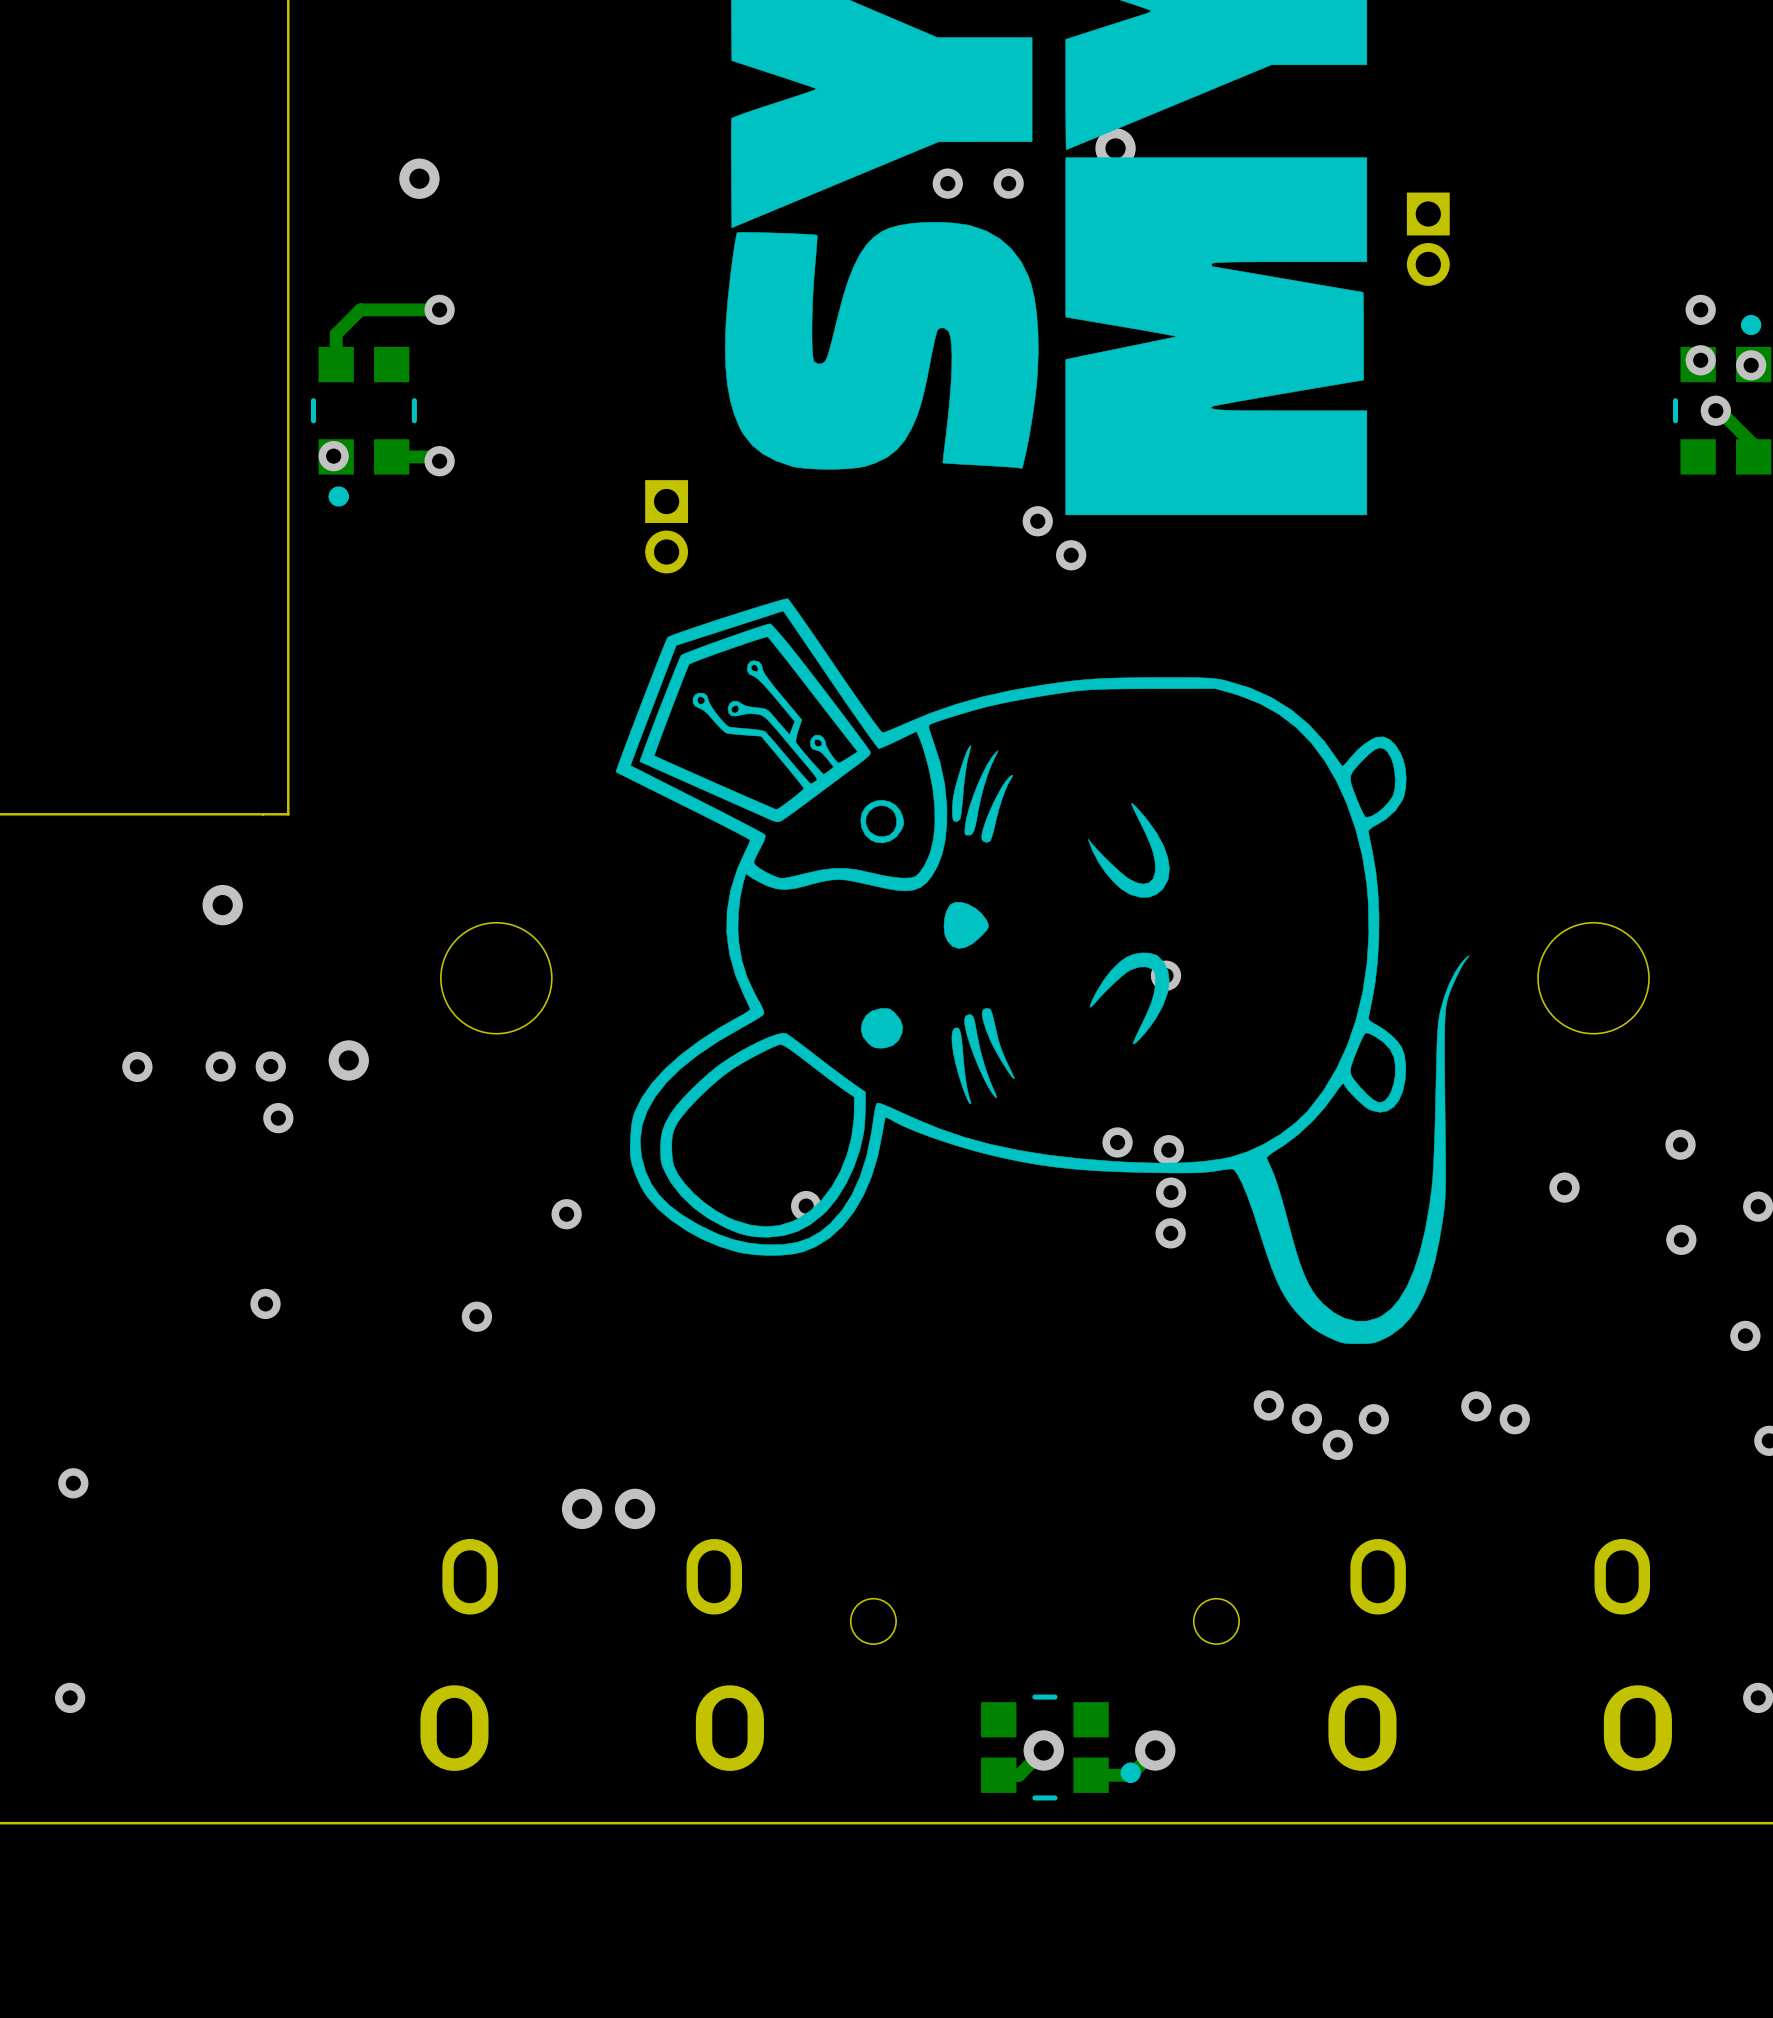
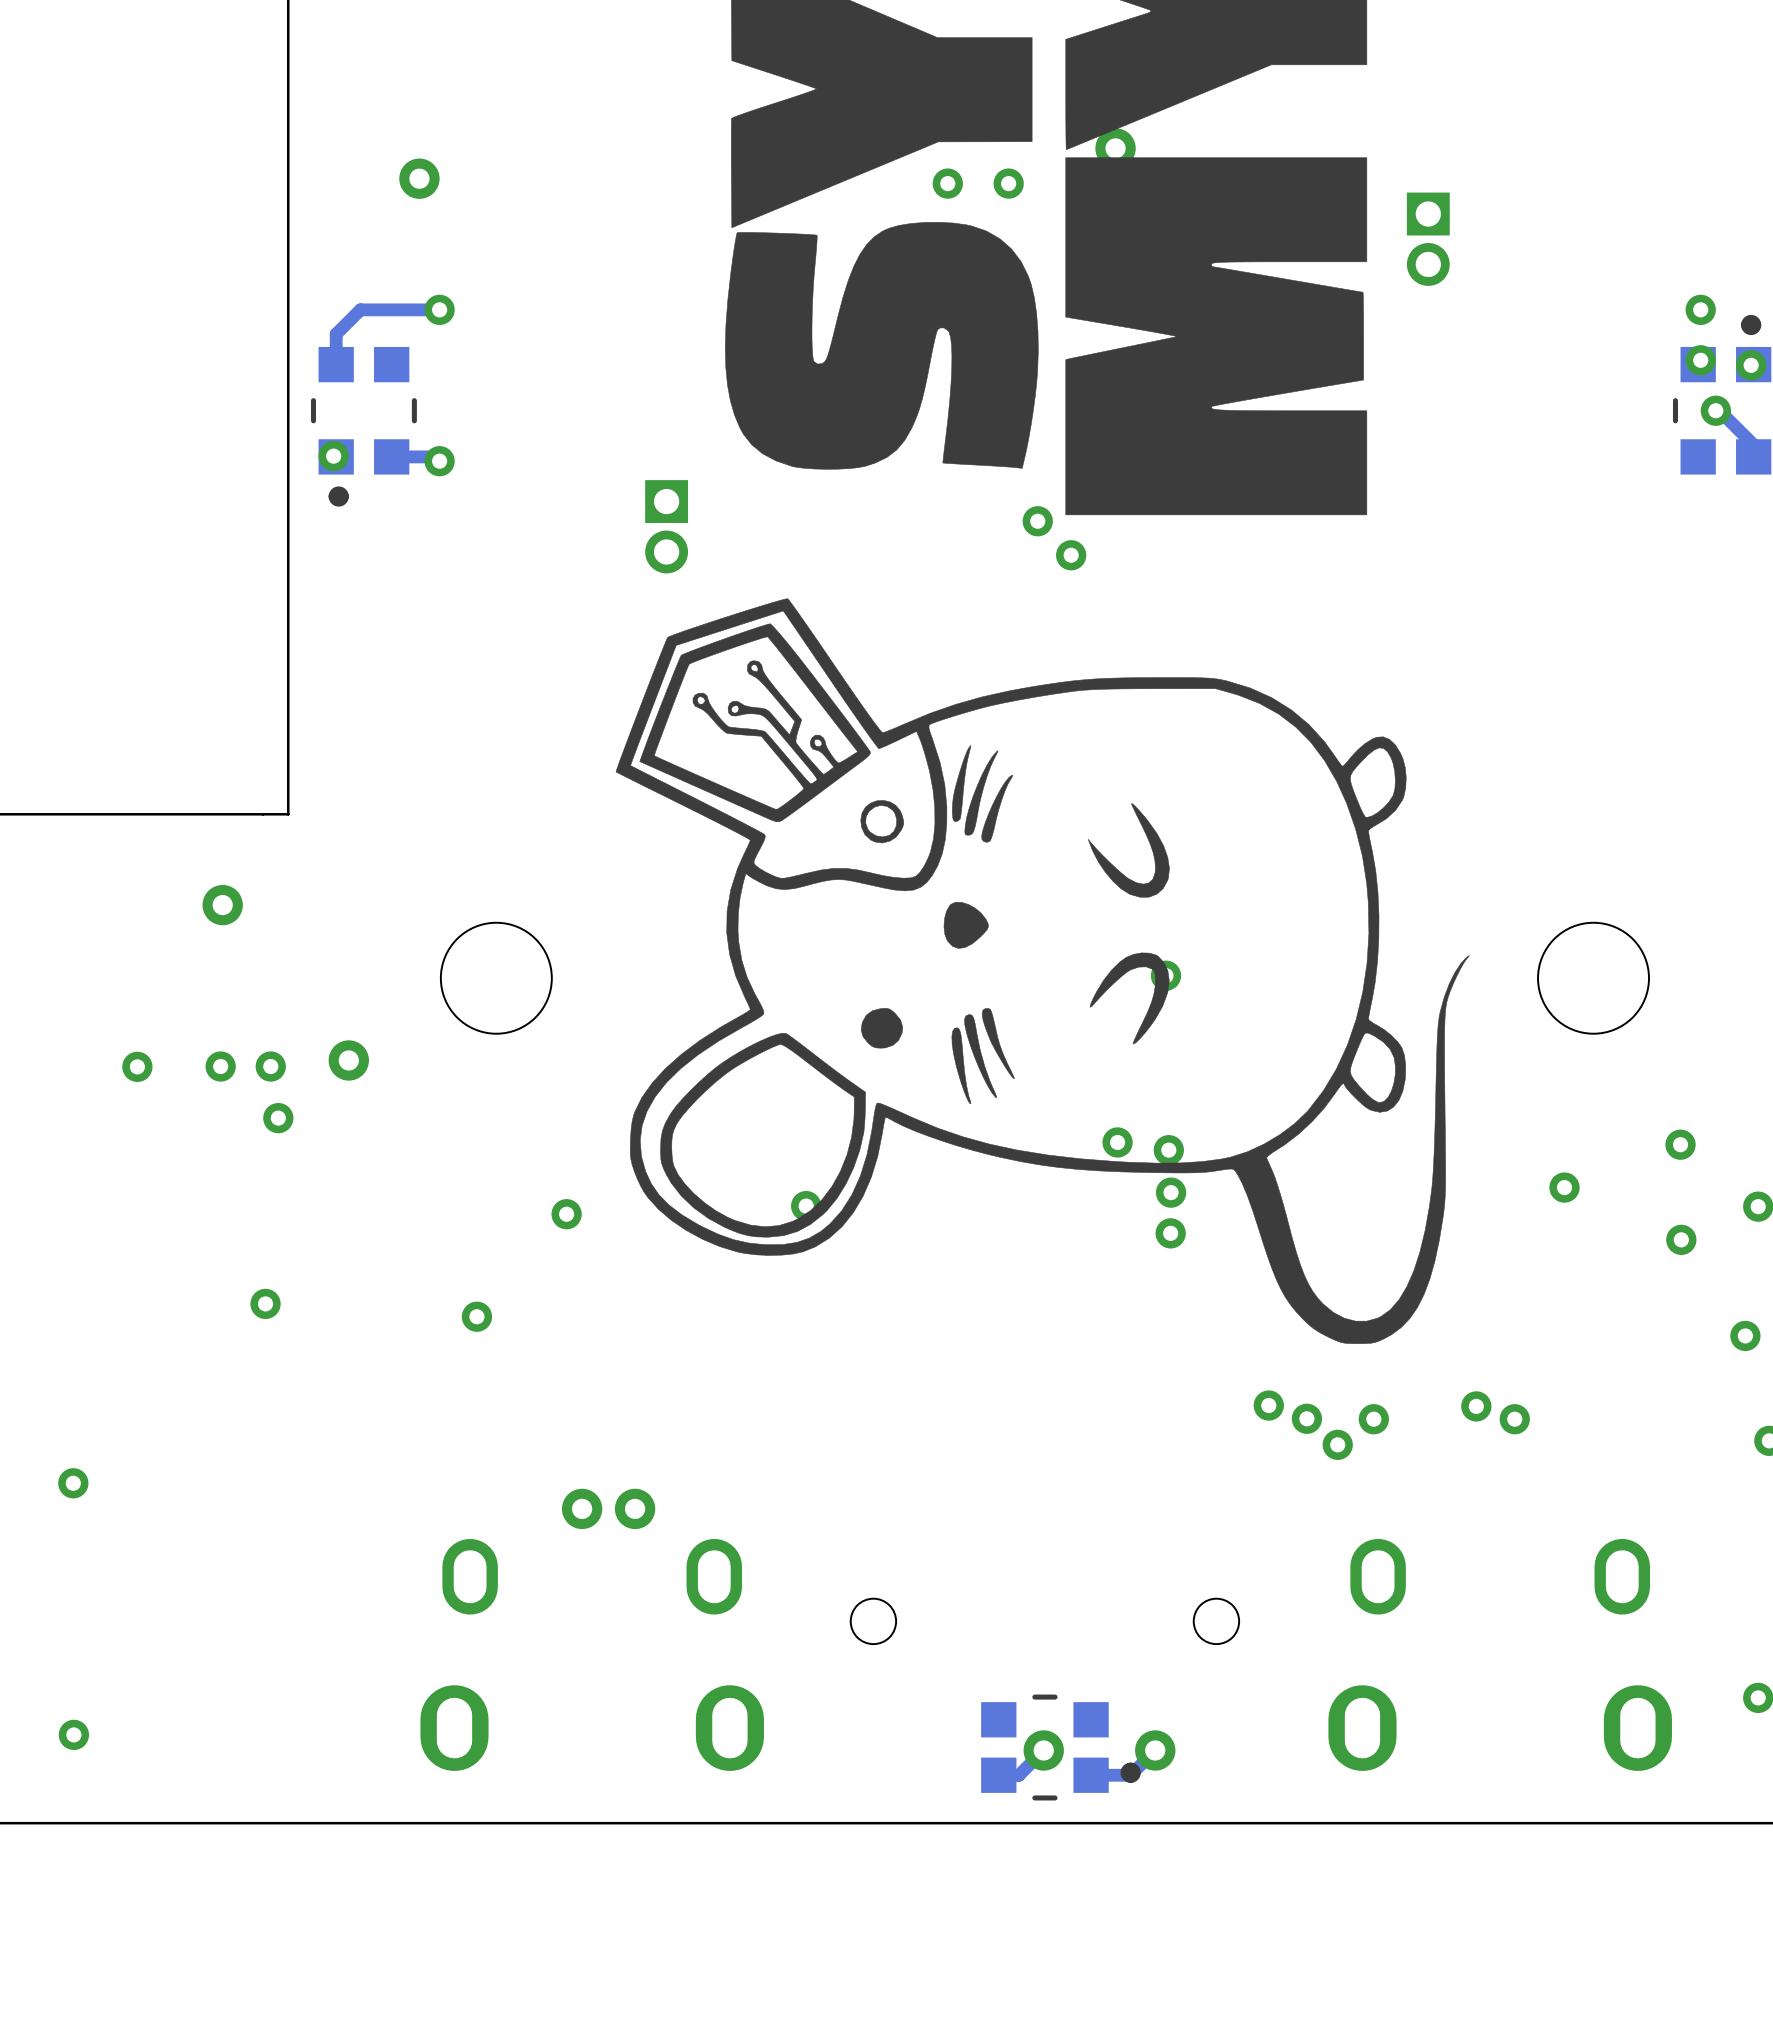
via position: (70, 1697) -> (73, 1734)

